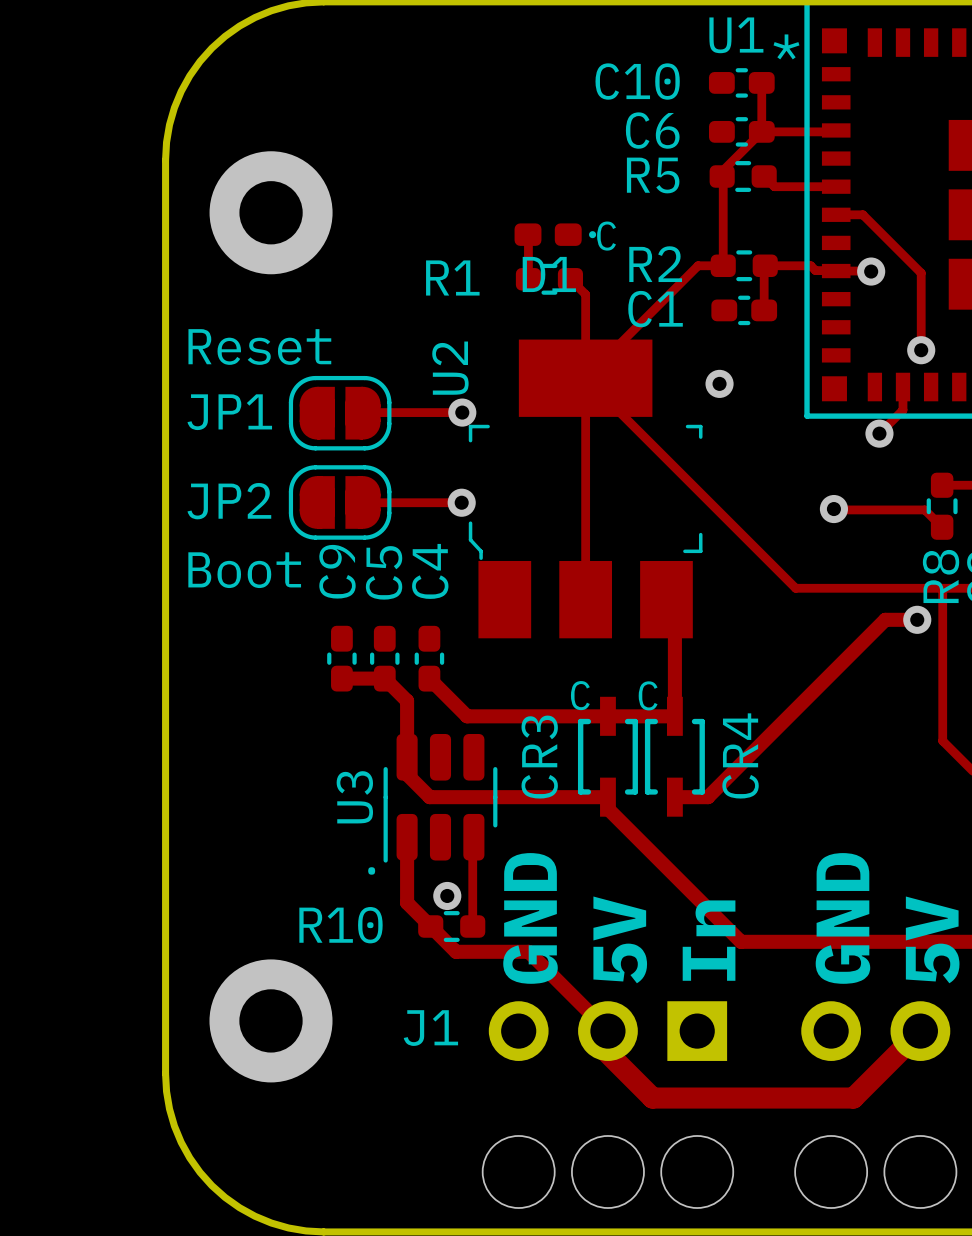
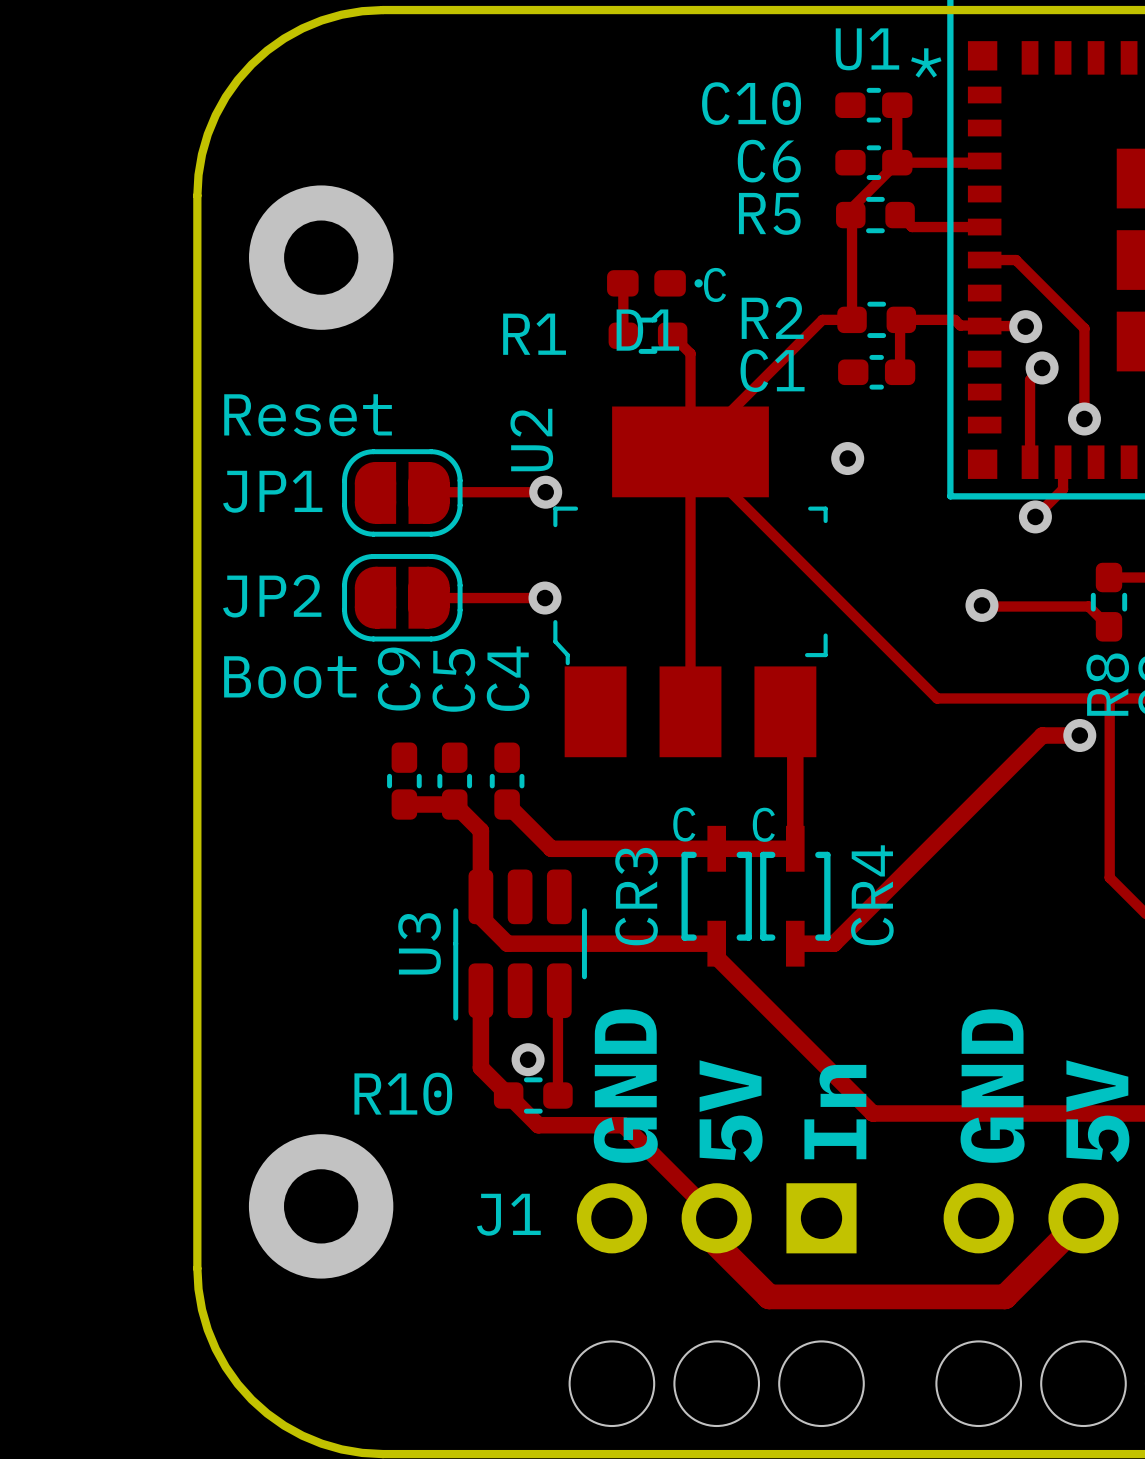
track: none -> (1042, 367) (1030, 380) (1030, 462)
via: none -> (1042, 367)
text: . (371, 870) -> none

